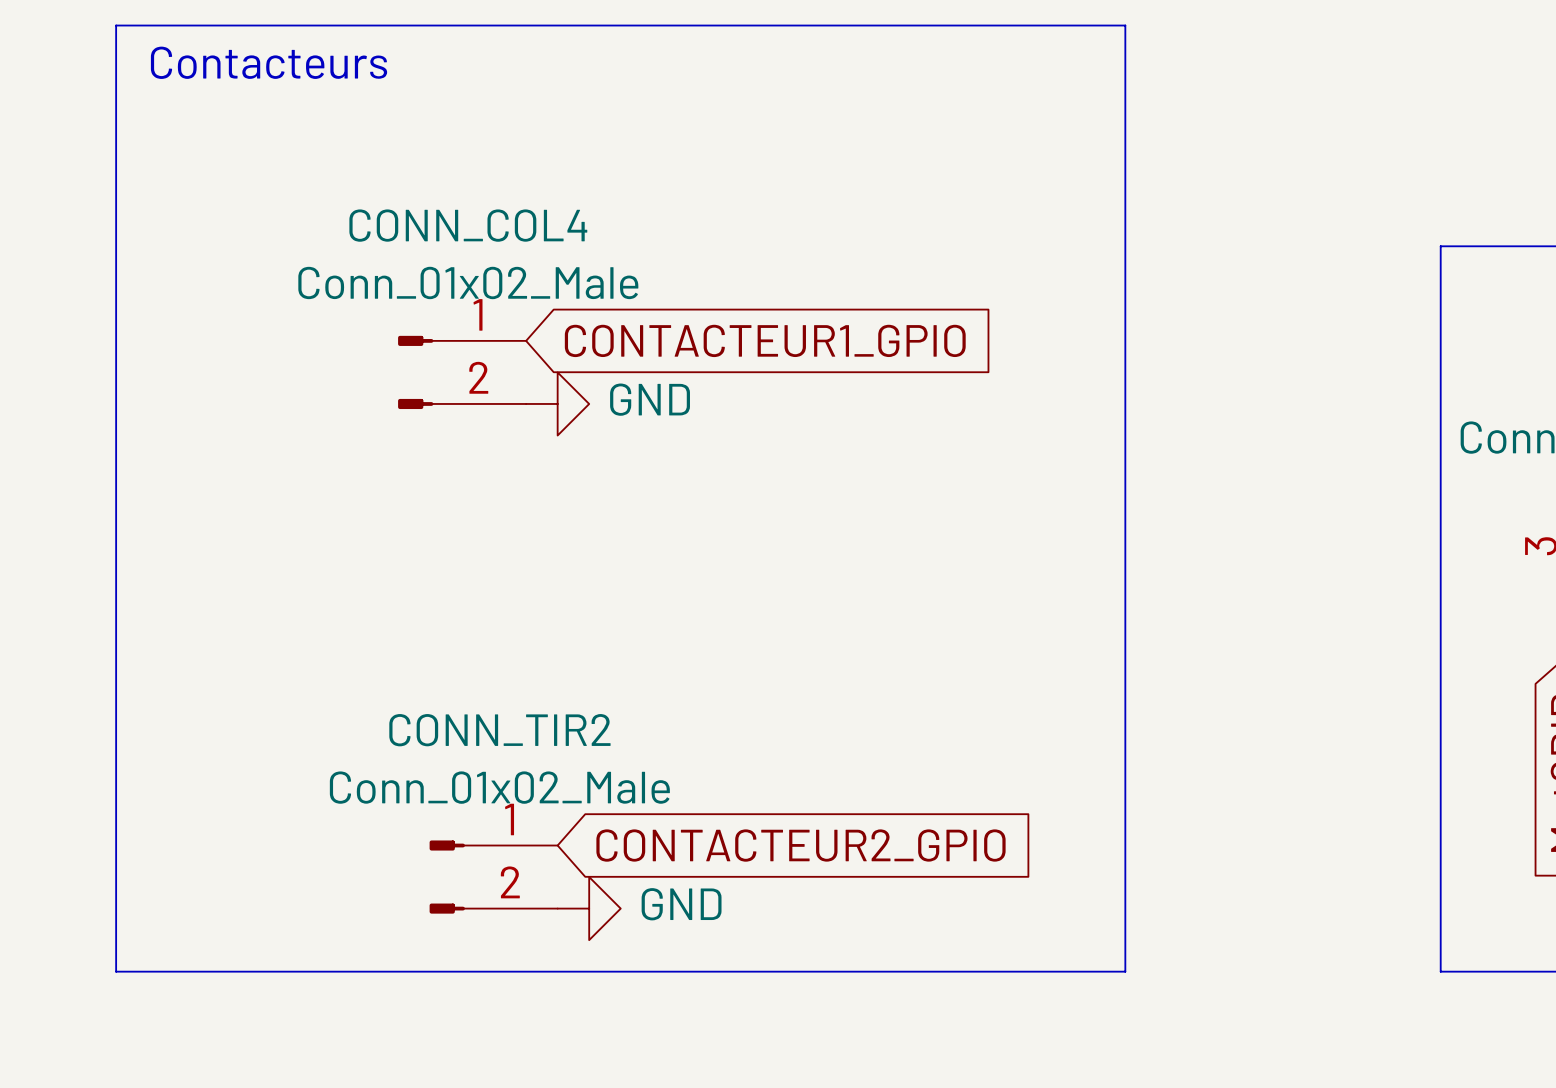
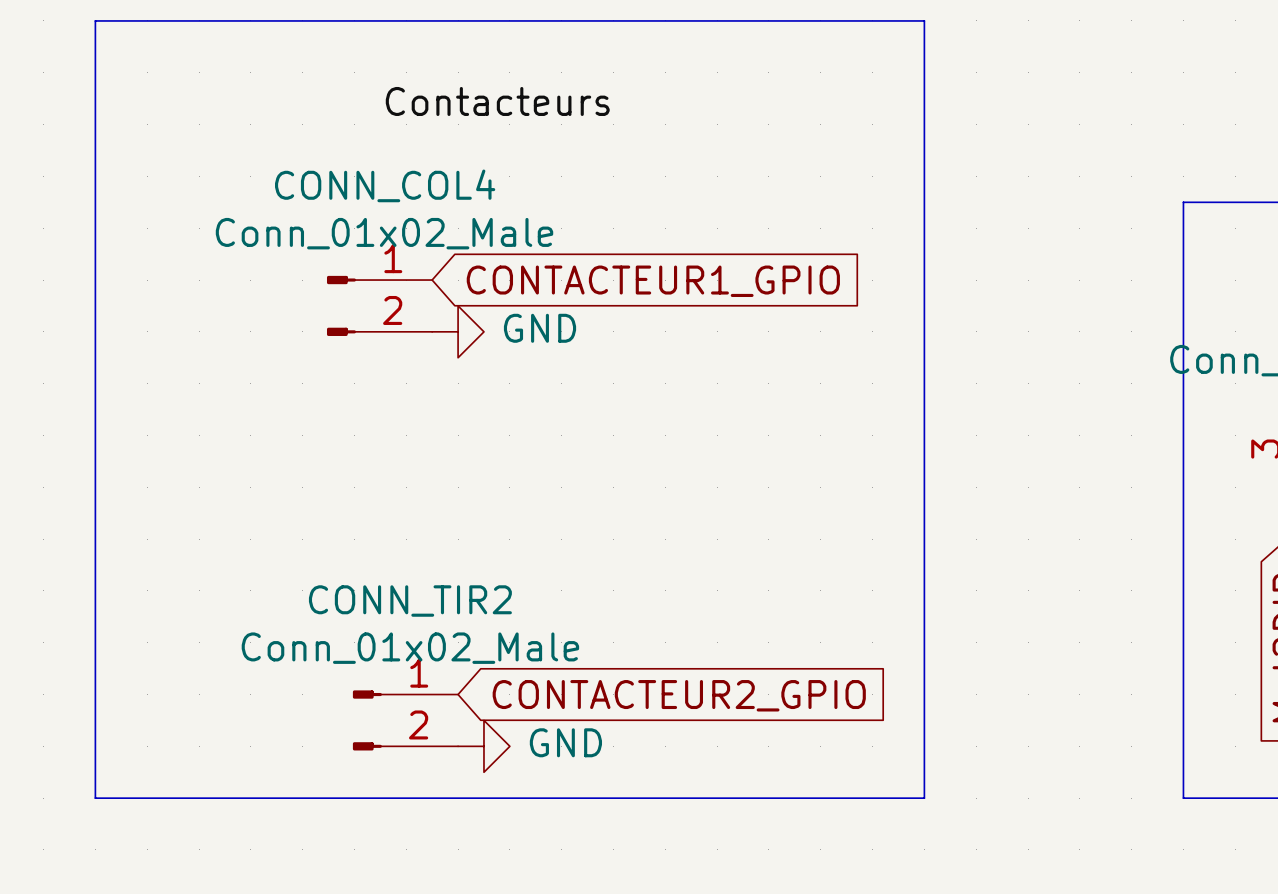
text: Contacteurs (269, 62) -> none
label: none -> Contacteurs (497, 101)

